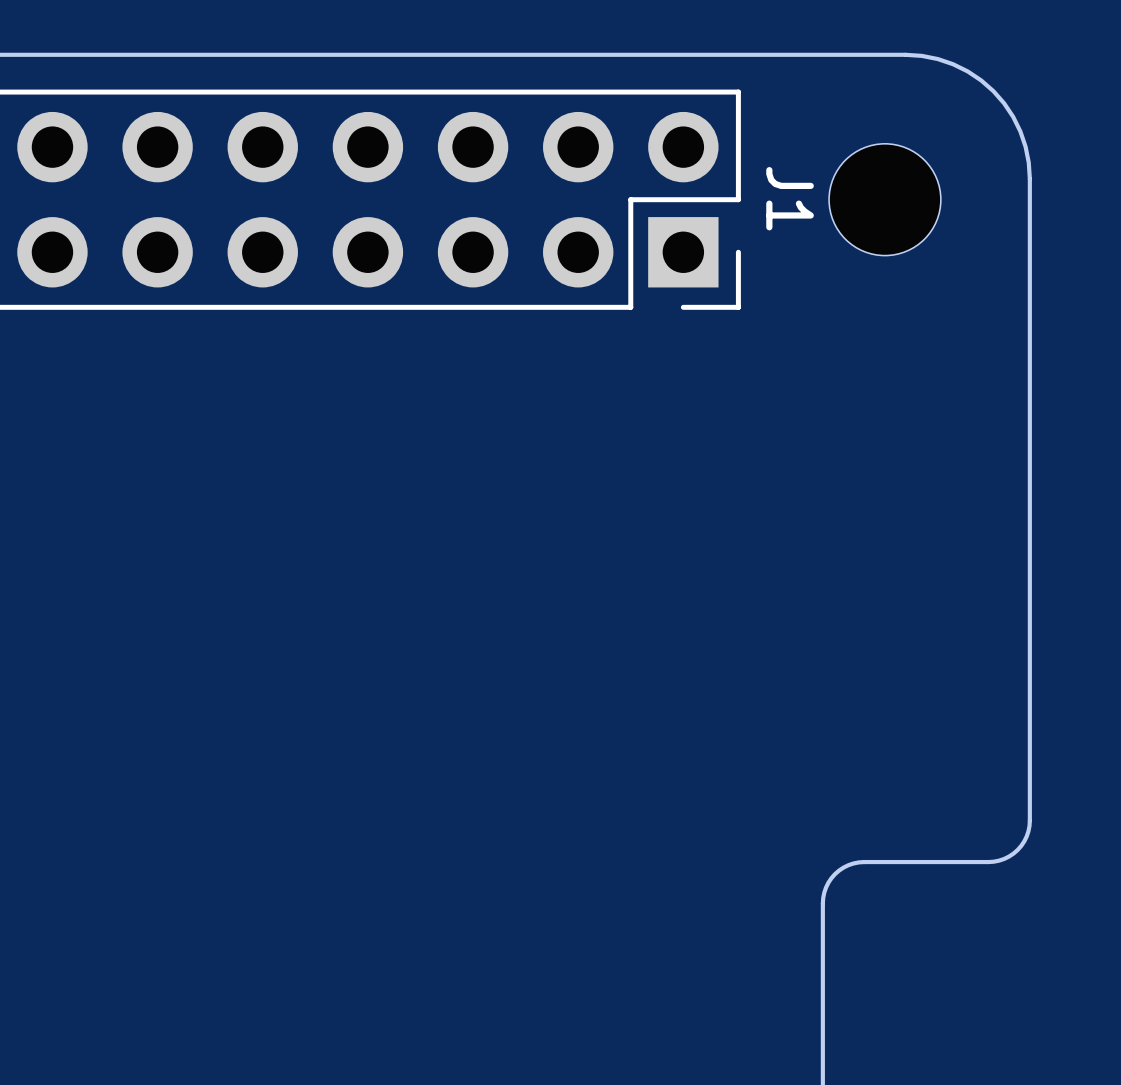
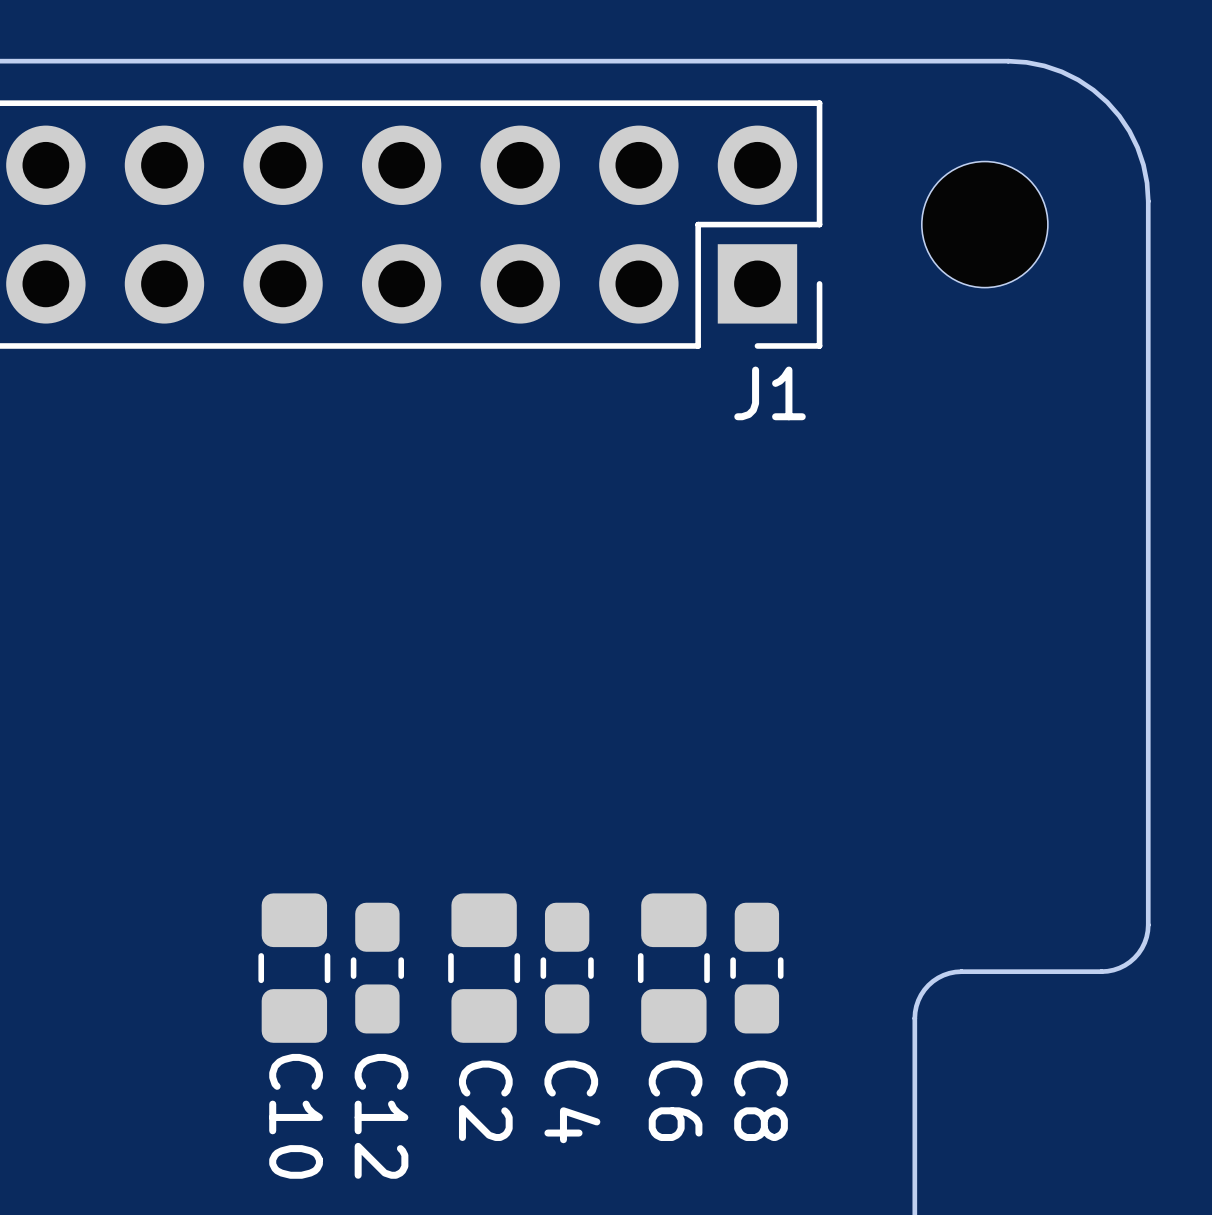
J1 name rotation: 0° (790, 198) -> 90° counterclockwise (770, 393)
J1 name position: J1 (790, 198) -> J1 (770, 393)
C10: none -> (294, 968)
C12: none -> (377, 968)
C2: none -> (484, 968)
C4: none -> (567, 968)
C6: none -> (673, 968)
C8: none -> (756, 968)

